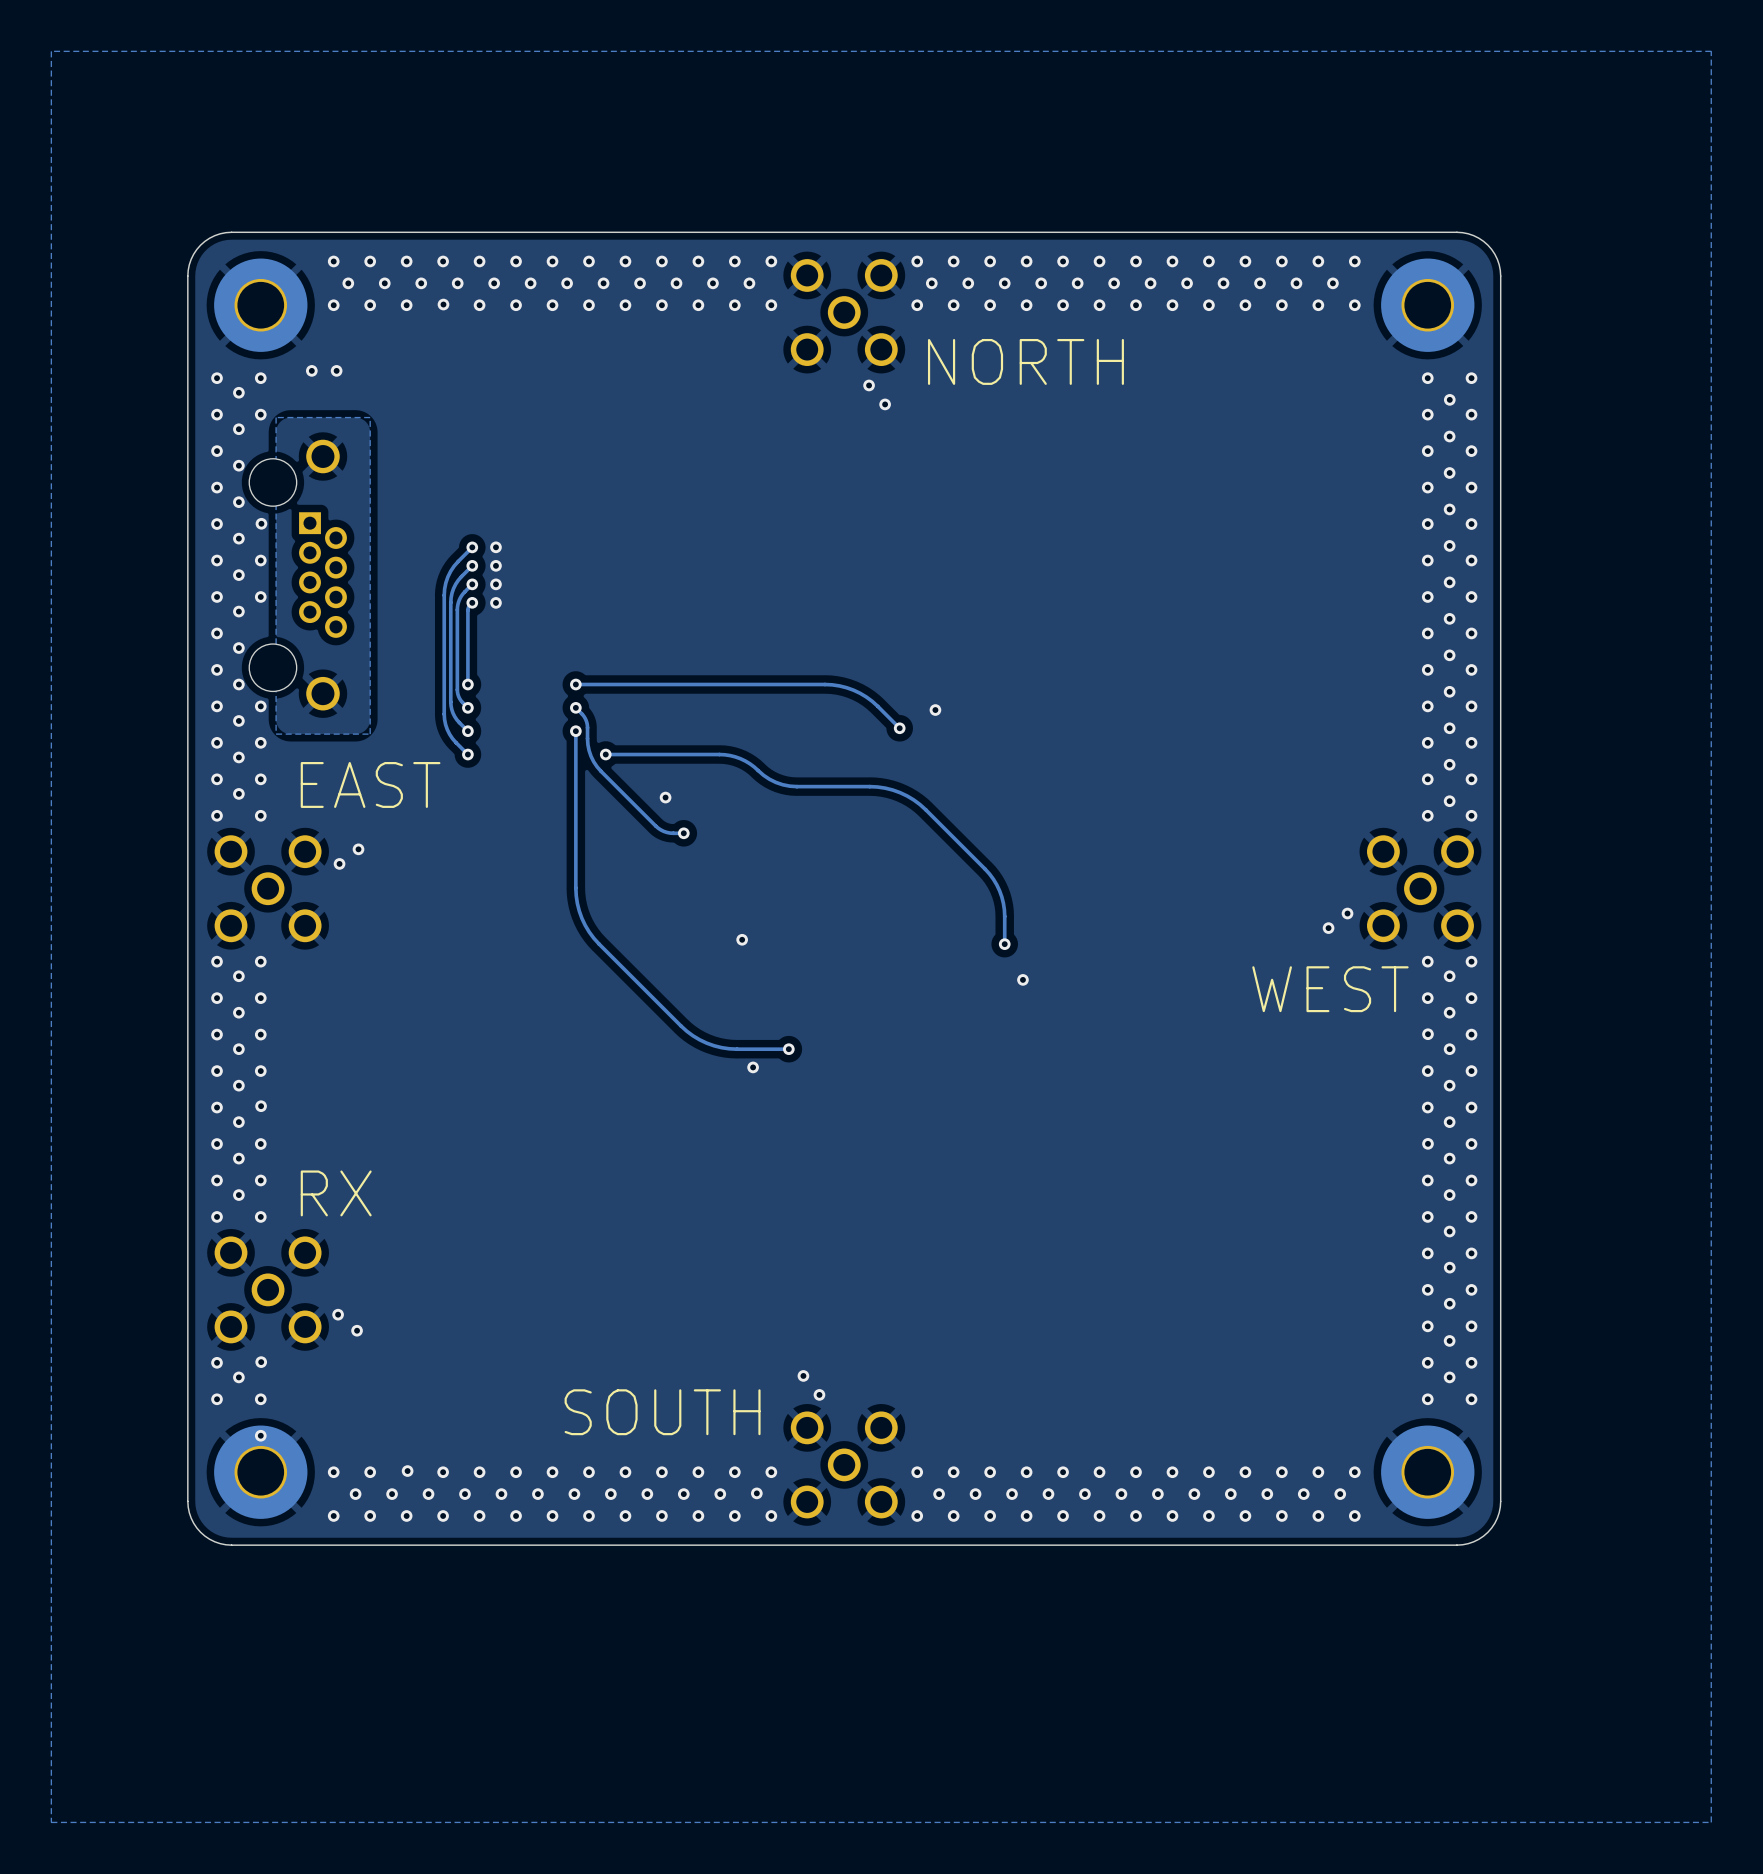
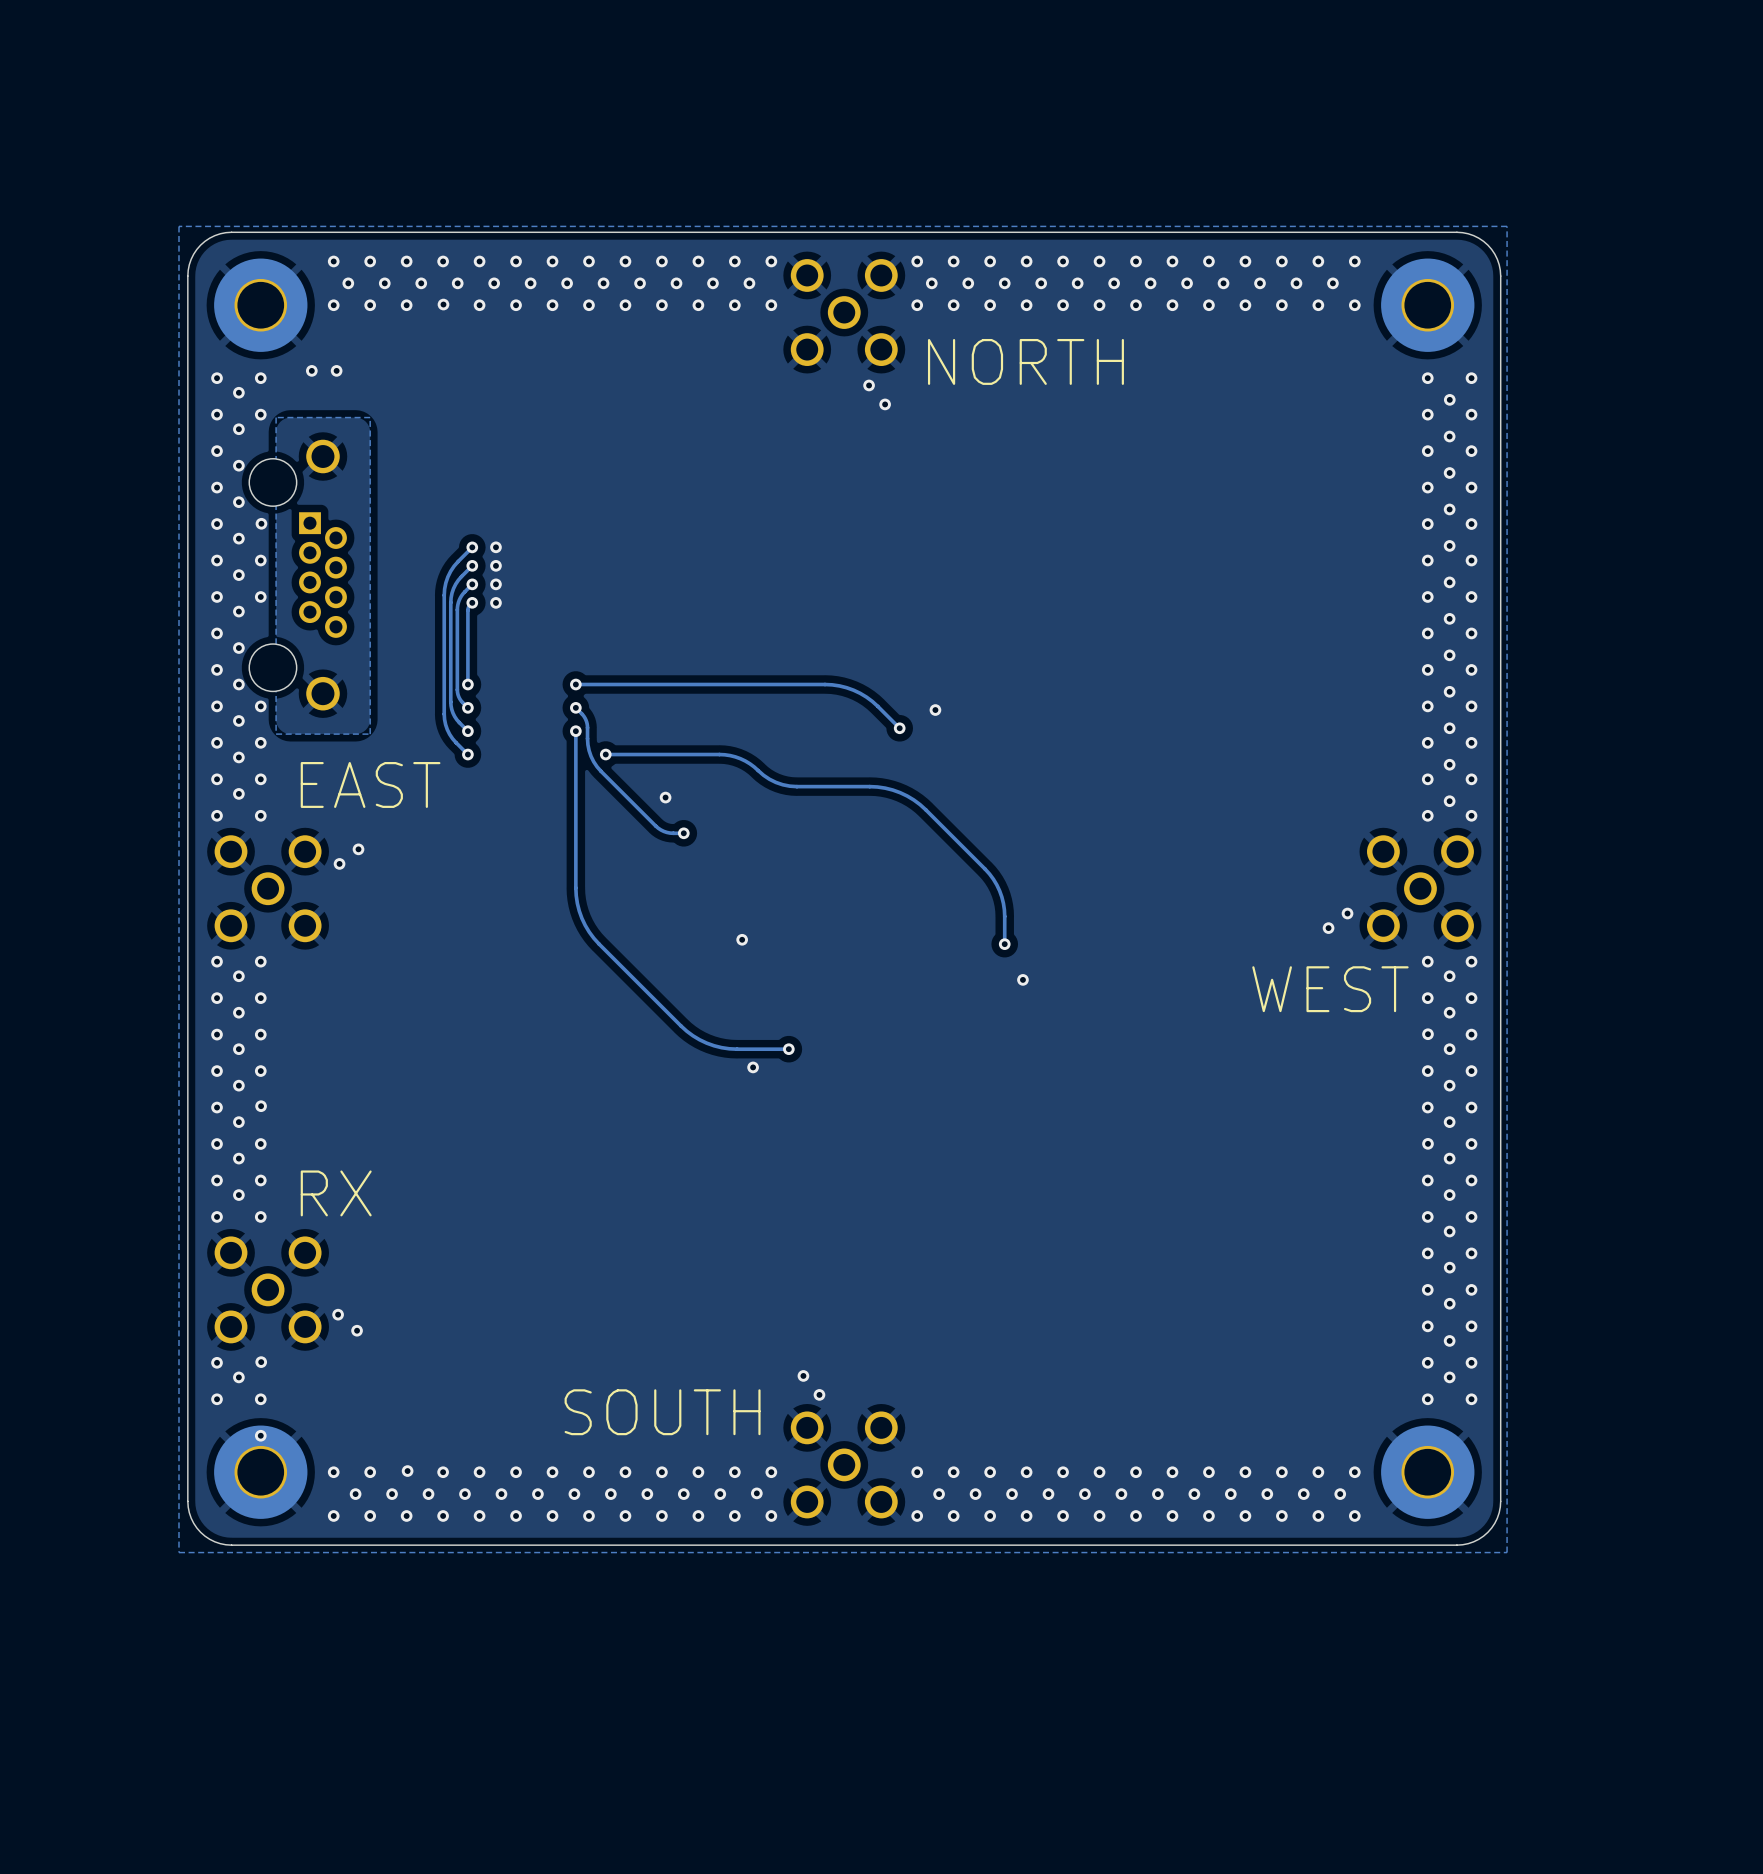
zone outline: (1711, 51) (1711, 1822) (51, 1822) (51, 51) (1711, 51) -> (1507, 226) (1507, 1552) (178, 1552) (178, 226) (1507, 226)

